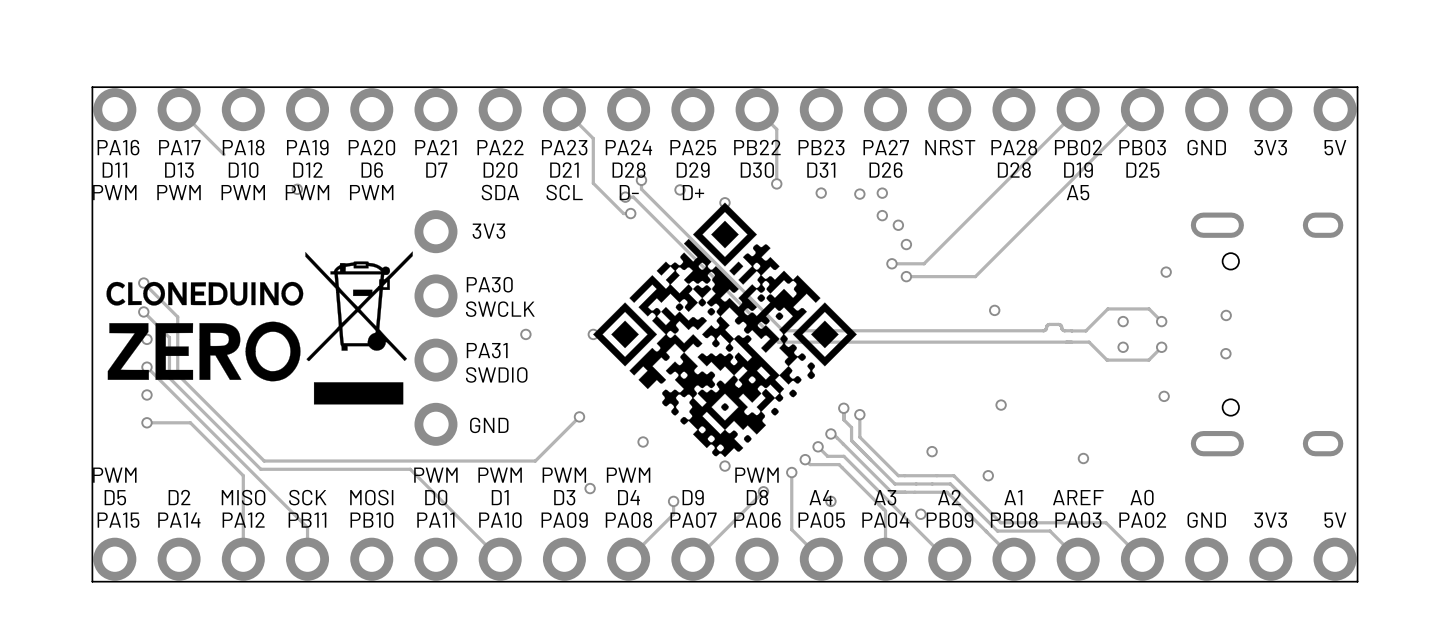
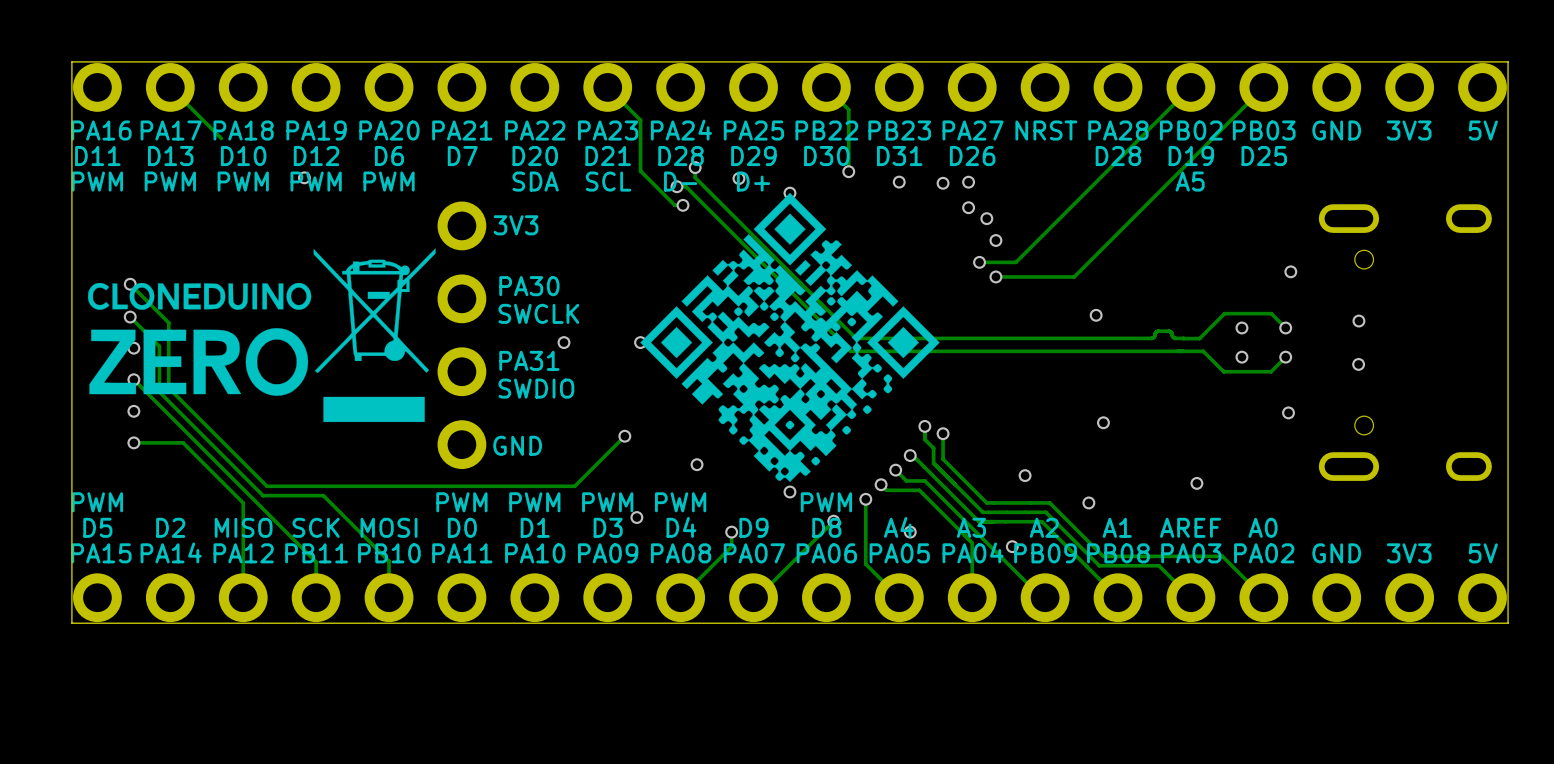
track: (313, 469) (410, 469) (500, 559) -> (323, 495) (389, 561) (389, 597)

